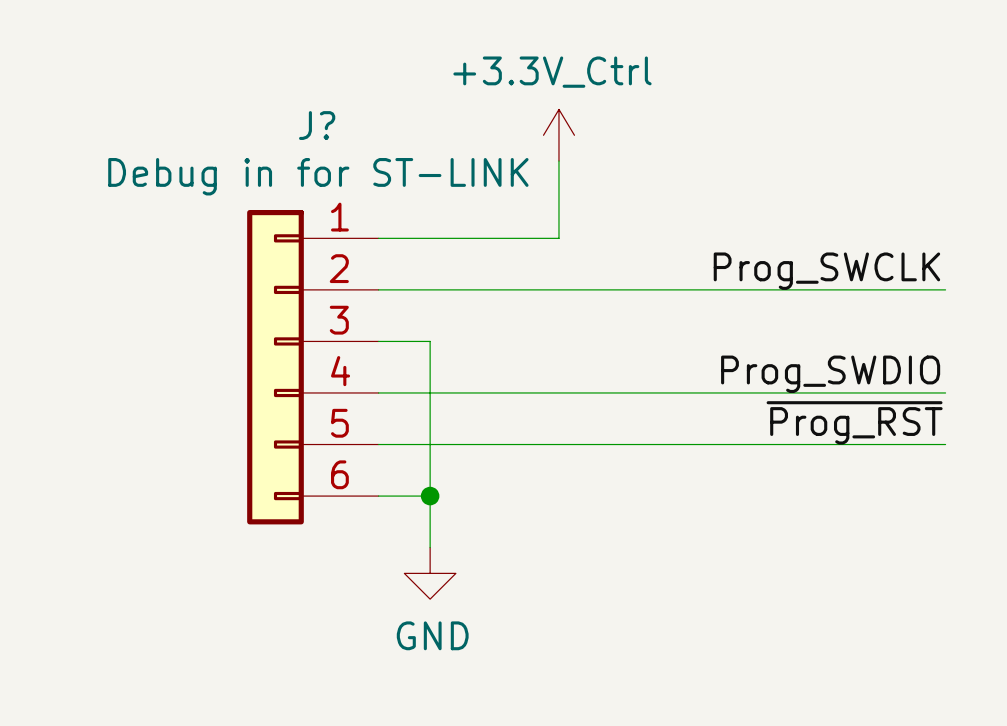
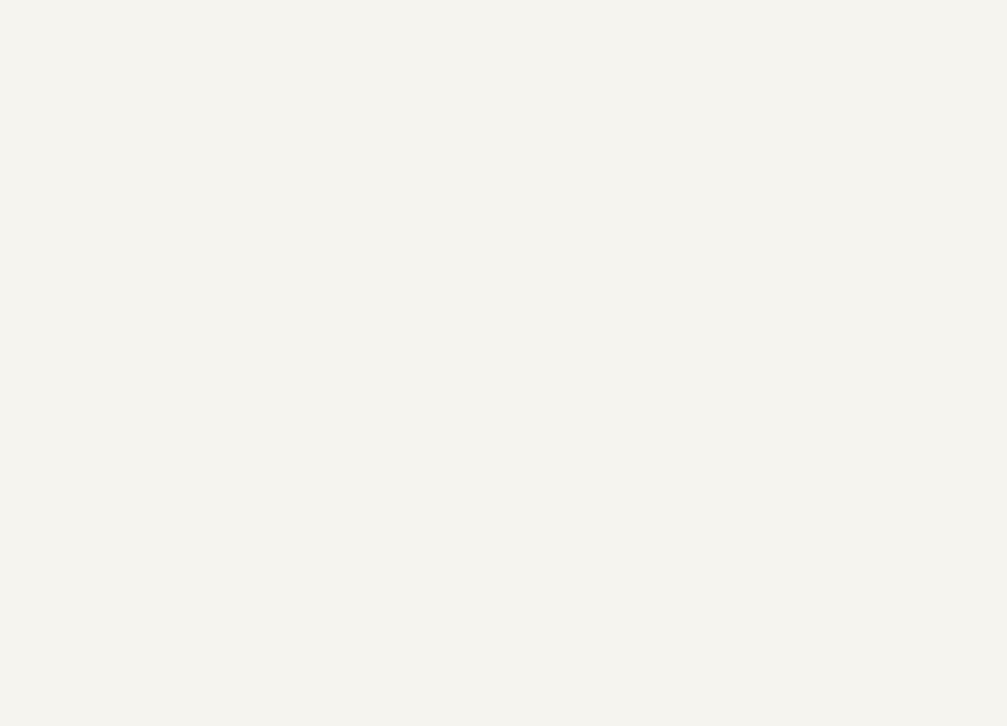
power symbol: +3.3V_Ctrl (558, 135) -> none
wire: (558, 161) (558, 238) (378, 238) -> none
label: Prog_SWCLK (826, 271) -> none
wire: (378, 289) (945, 289) -> none
wire: (378, 341) (430, 341) (430, 547) -> none
J?: Debug in for ST-LINK (312, 367) -> none
label: Prog_SWDIO (830, 374) -> none
wire: (378, 392) (945, 392) -> none
label: ~{Prog_RST} (854, 422) -> none
wire: (378, 444) (945, 444) -> none
wire: (378, 496) (430, 496) -> none
junction: (430, 496) -> none
power symbol: GND (430, 573) -> none

